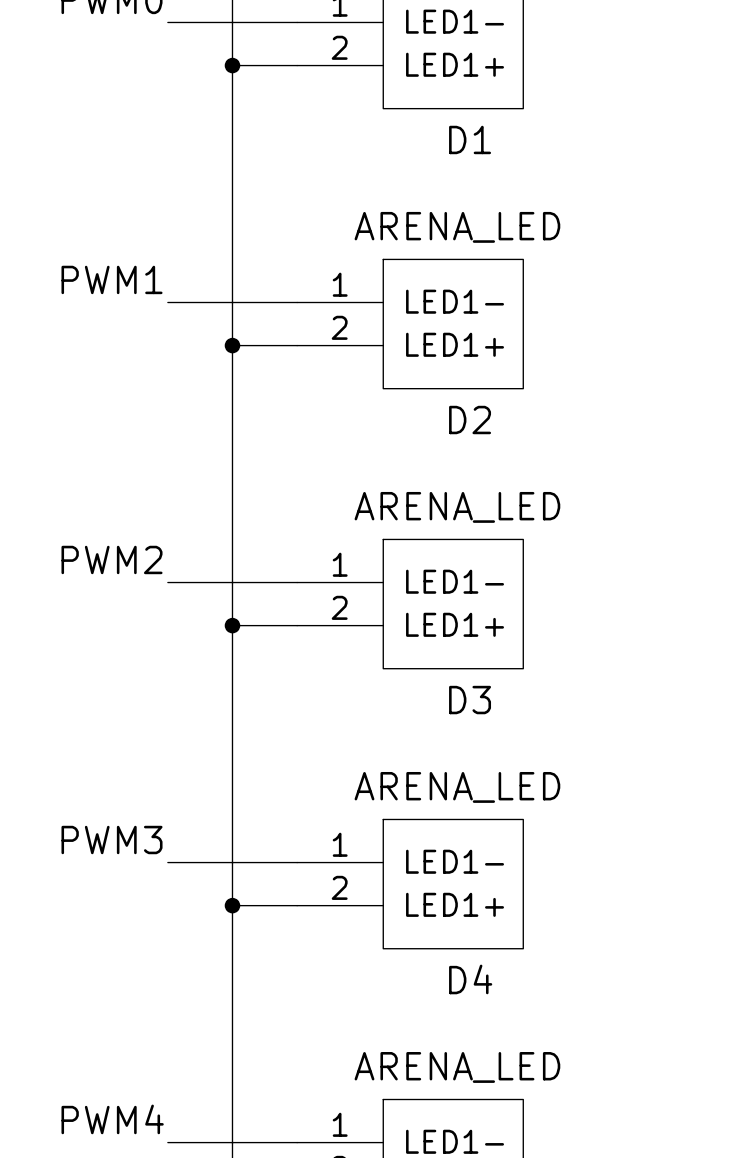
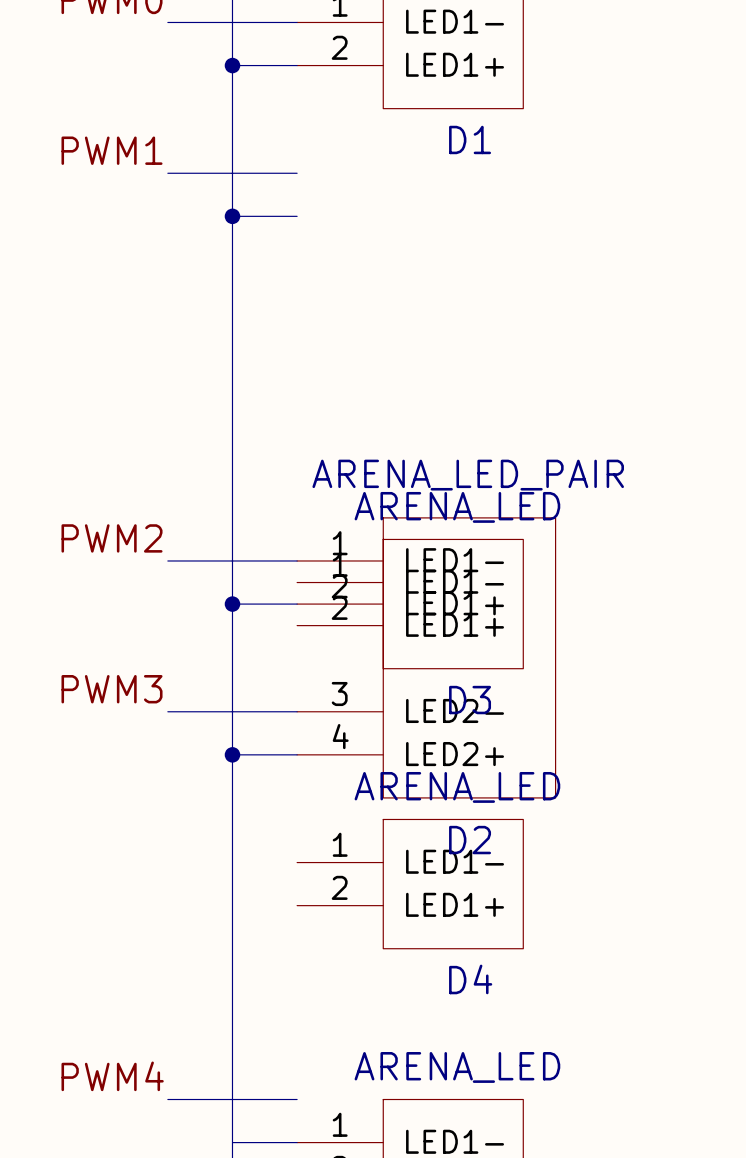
junction: none -> (232, 216)
D2 value: ARENA_LED (457, 227) -> ARENA_LED_PAIR (468, 475)
D2 symbol: [297, 259, 524, 389] -> [297, 517, 556, 798]
label position: PWM1 (112, 279) -> PWM1 (112, 150)
wire: (167, 302) (297, 302) -> (167, 173) (297, 173)
wire: (232, 345) (297, 345) -> (232, 216) (297, 216)
junction: (232, 345) -> none
D2 name position: D2 (470, 420) -> D2 (470, 840)
label position: PWM2 (112, 559) -> PWM2 (112, 538)
wire: (167, 582) (297, 582) -> (167, 560) (297, 560)
wire: (232, 625) (297, 625) -> (232, 604) (297, 604)
junction position: (232, 625) -> (232, 604)
junction: none -> (232, 754)
label position: PWM3 (112, 840) -> PWM3 (112, 689)
wire: (167, 862) (297, 862) -> (167, 711) (297, 711)
wire: (232, 905) (297, 905) -> (232, 754) (297, 754)
junction: (232, 905) -> none
wire: none -> (167, 1099) (297, 1099)
label position: PWM4 (112, 1119) -> PWM4 (112, 1076)
wire: (167, 1142) (232, 1142) -> none

